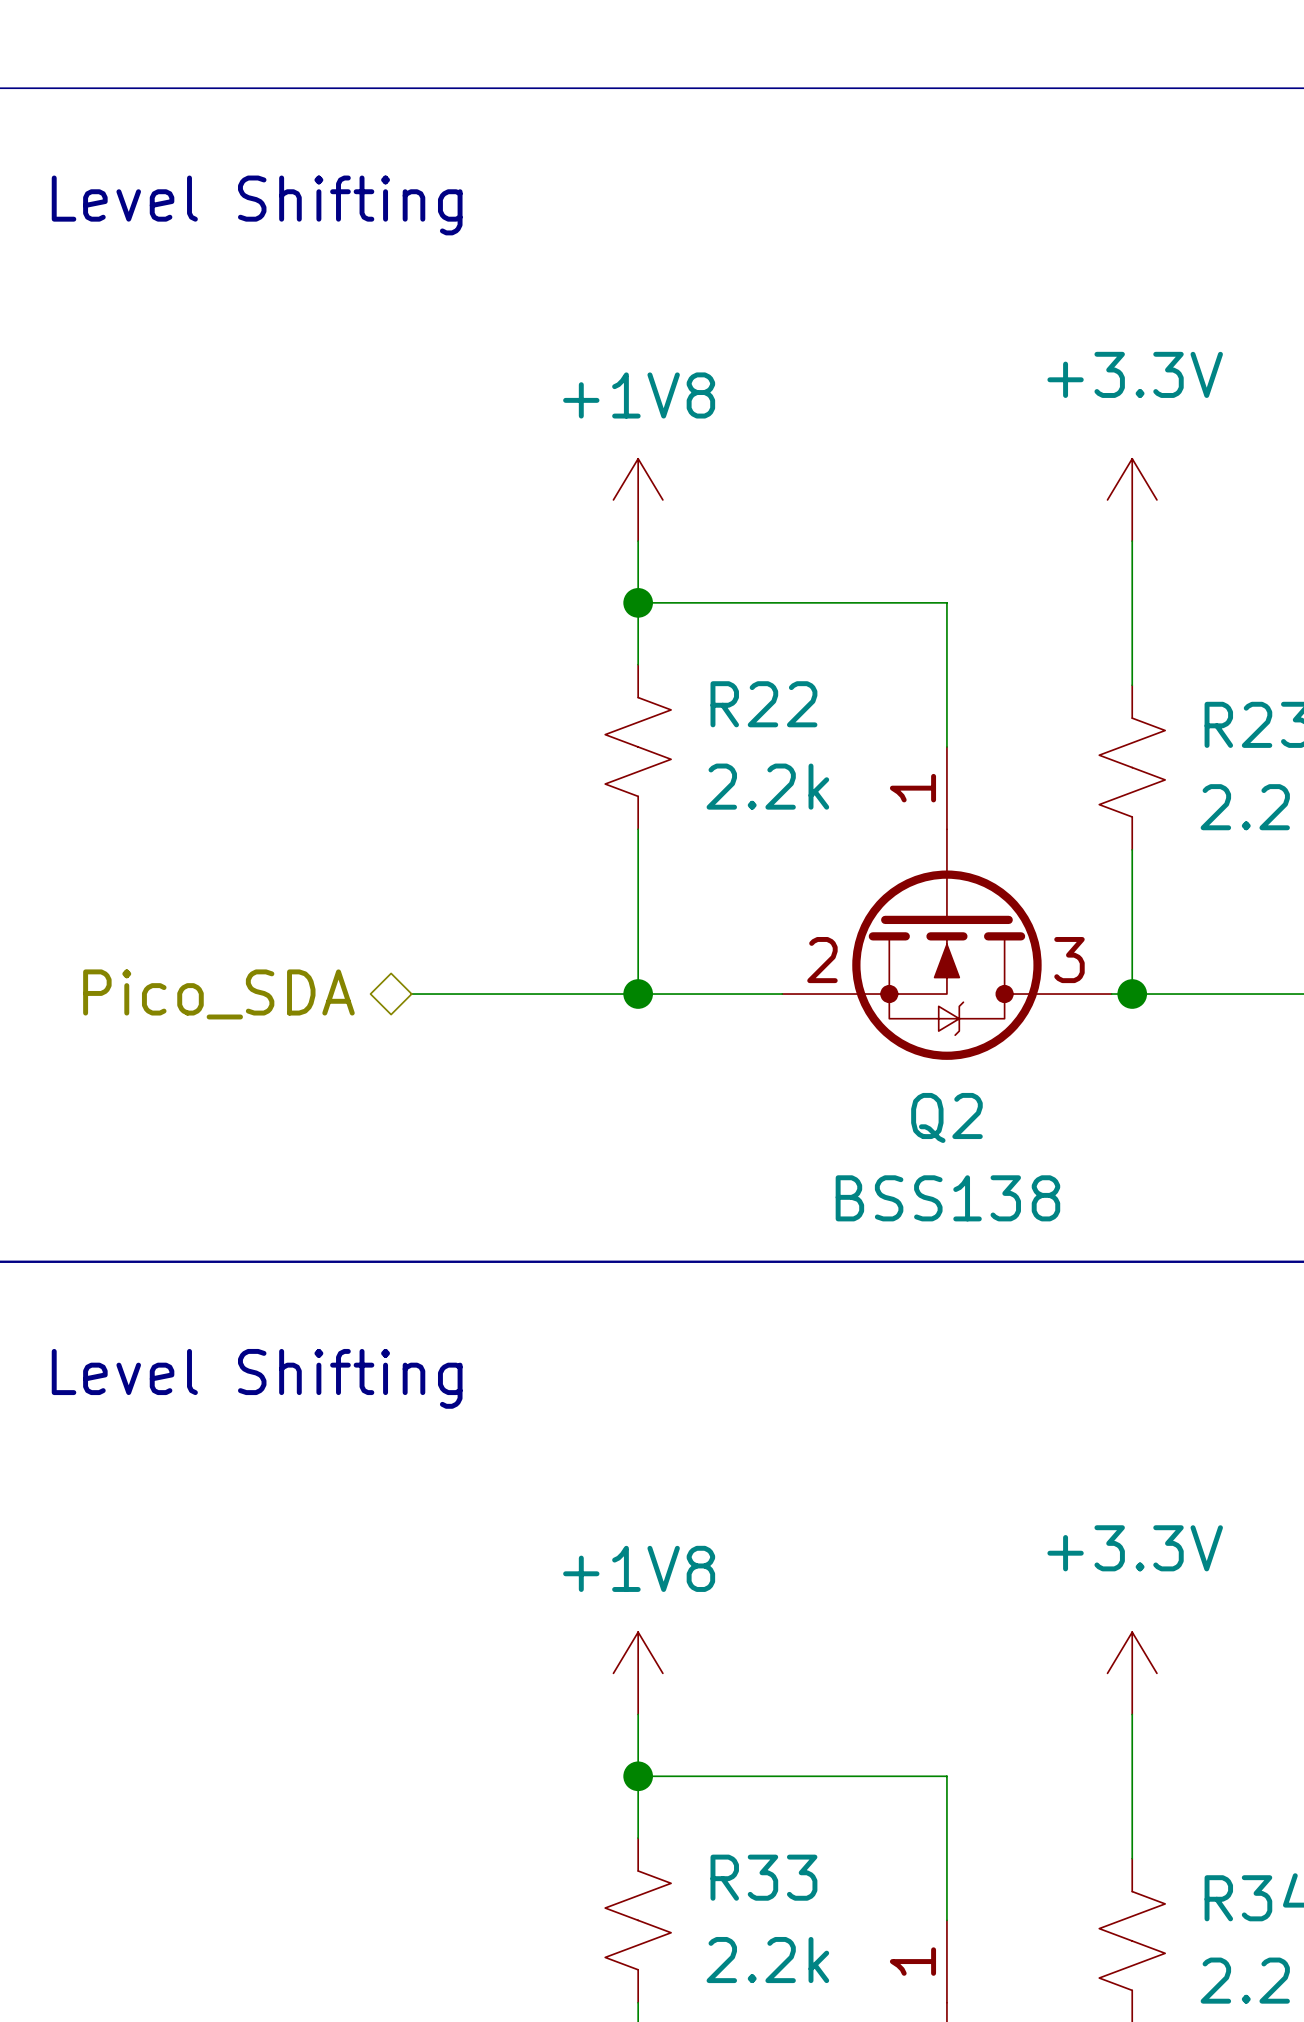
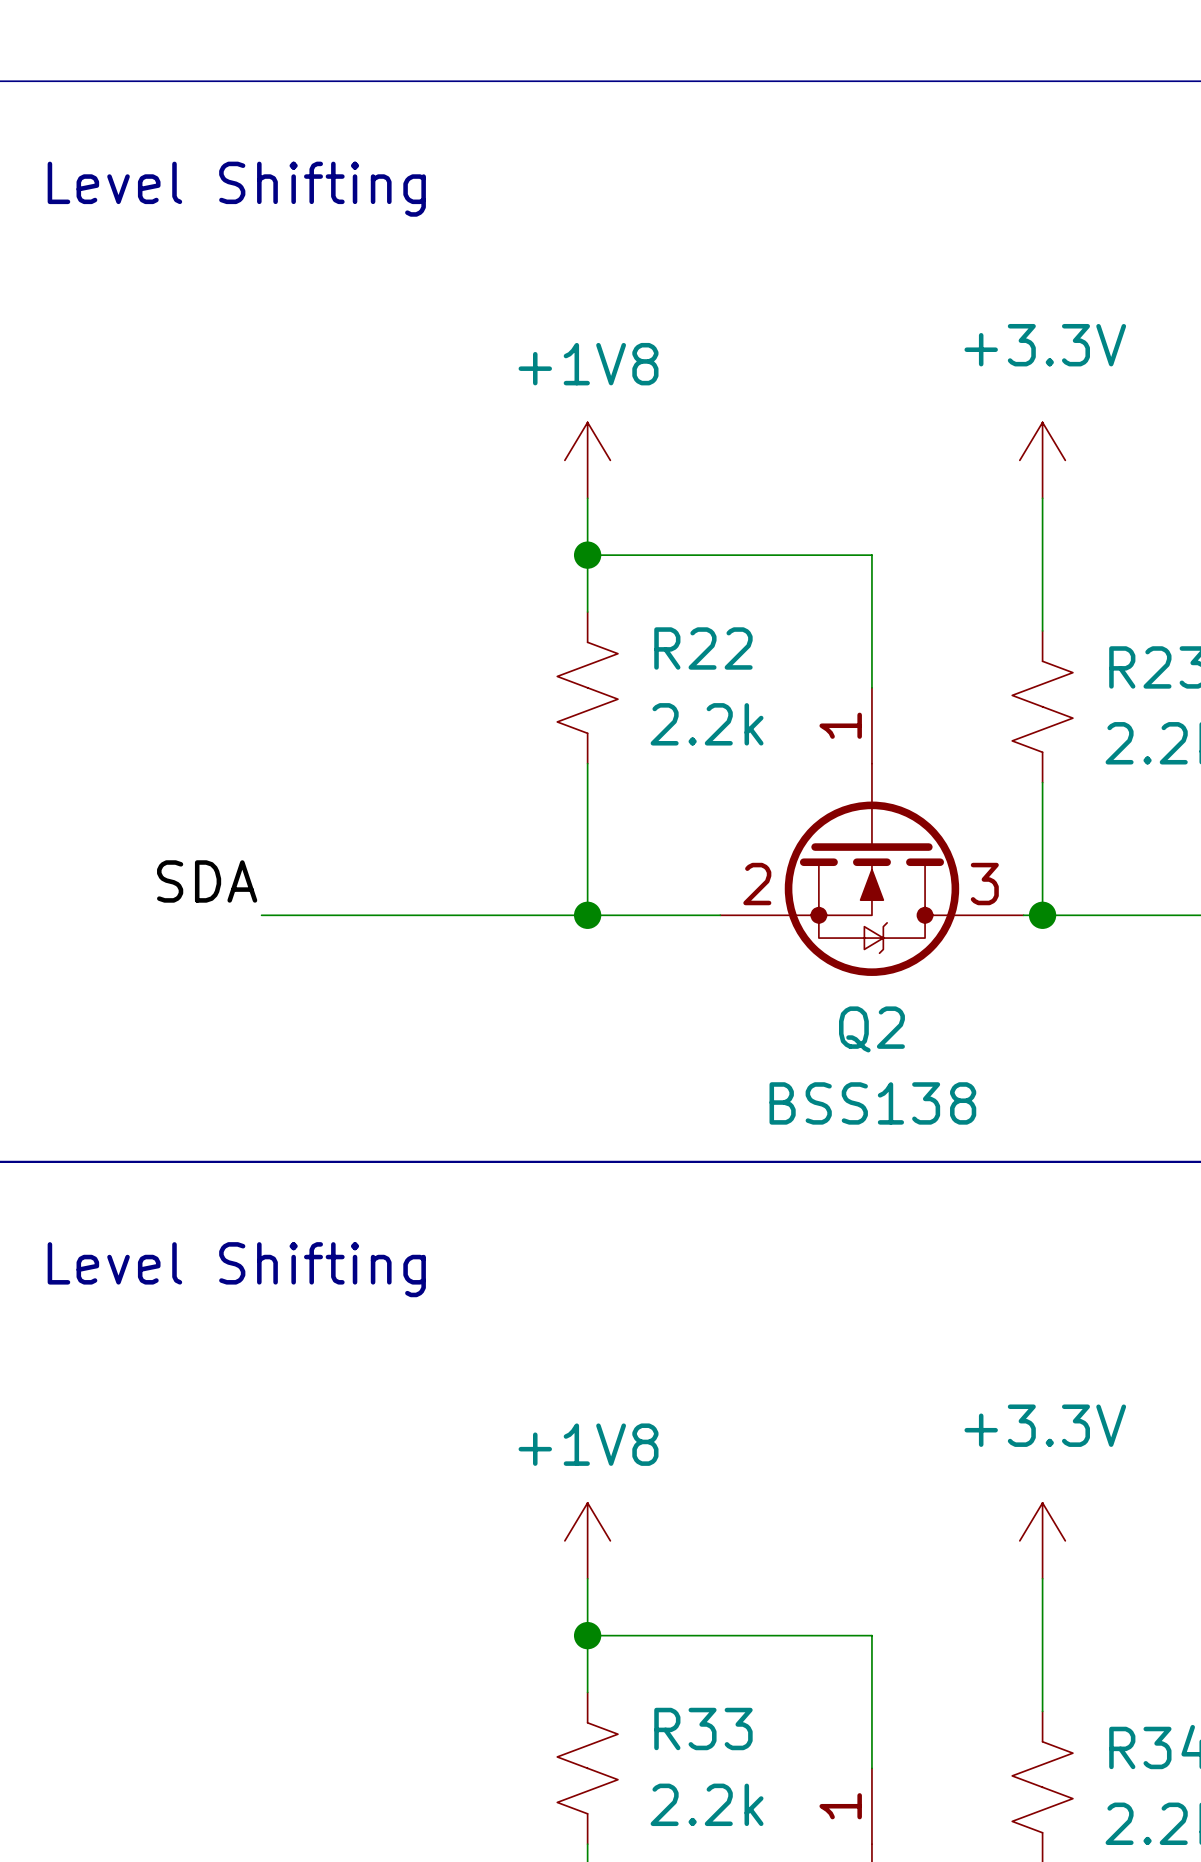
label: none -> SDA (207, 881)
hierarchical label: Pico_SDA (218, 994) -> none
wire: none -> (261, 915) (379, 915)

